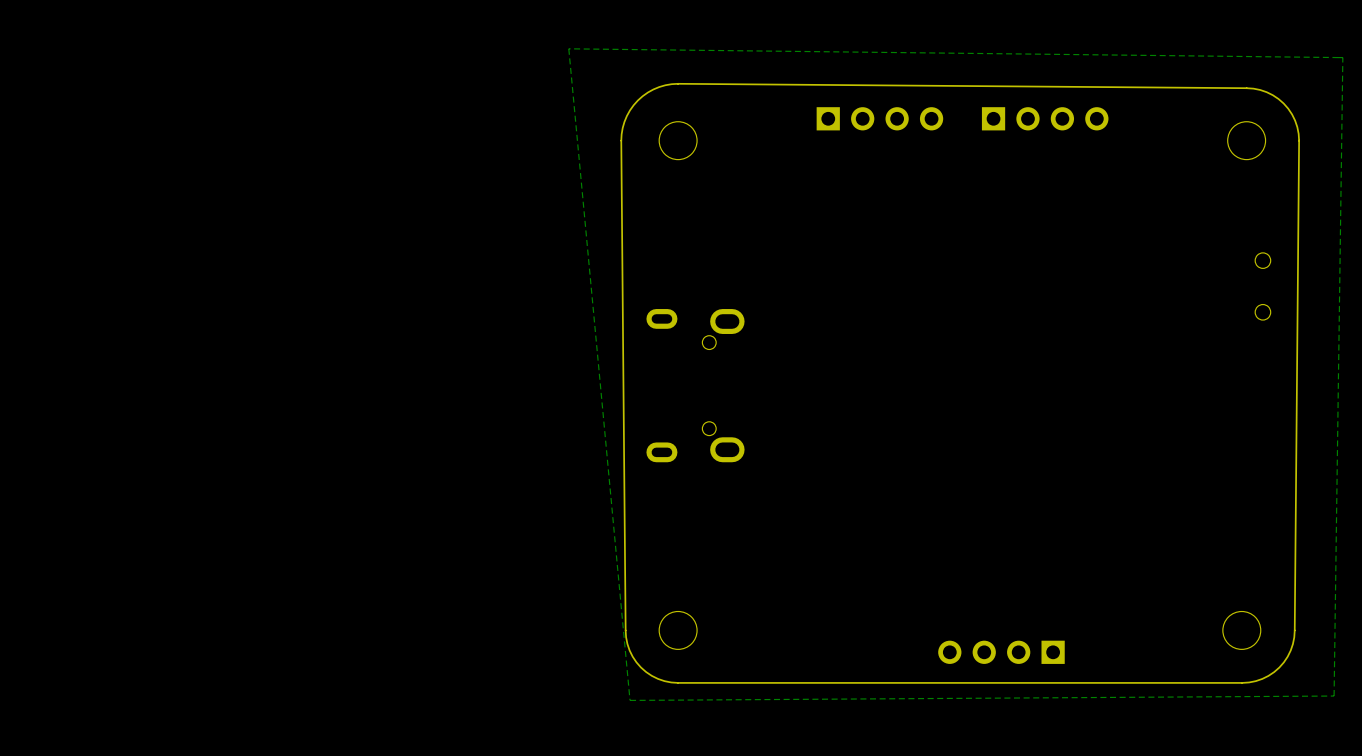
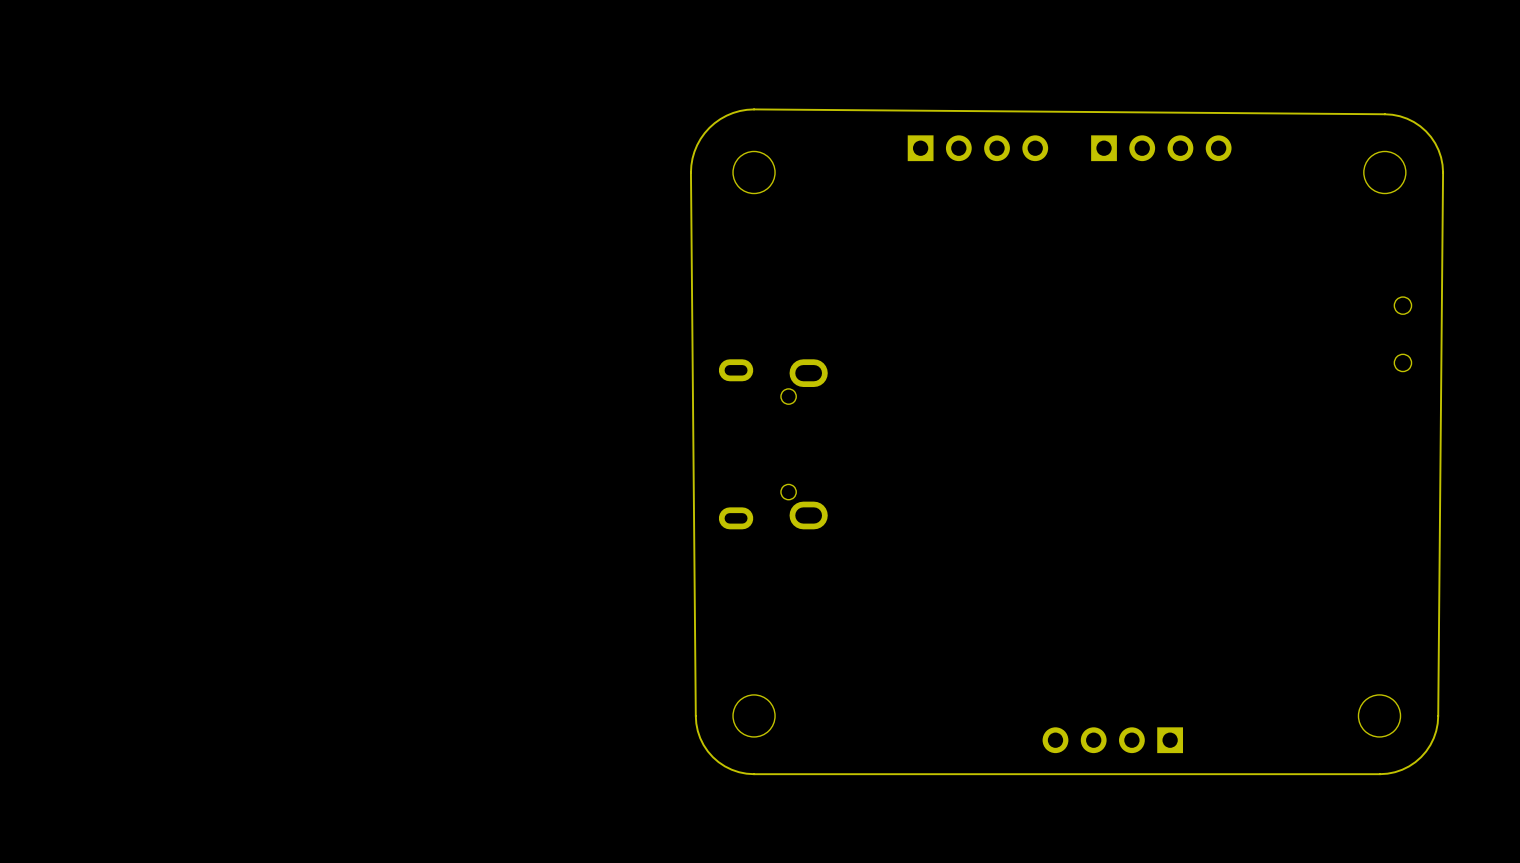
zone outline: (568, 48) (1342, 57) (1334, 696) (630, 700) (568, 48) -> none

